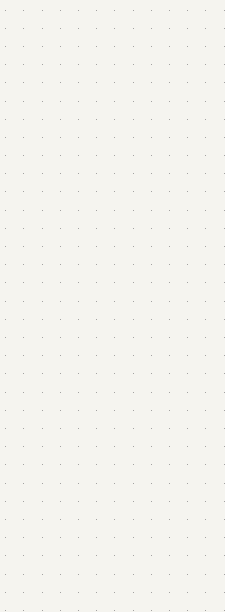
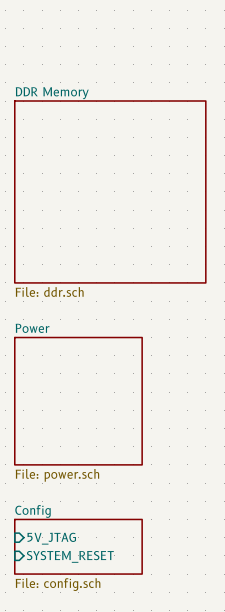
sheet DDR Memory: none -> File: ddr.sch (110, 191)
sheet Power: none -> File: power.sch (78, 401)
sheet pin: none -> 5V_JTAG (51, 538)
sheet Config: none -> File: config.sch (78, 546)
sheet pin: none -> SYSTEM_RESET (70, 556)

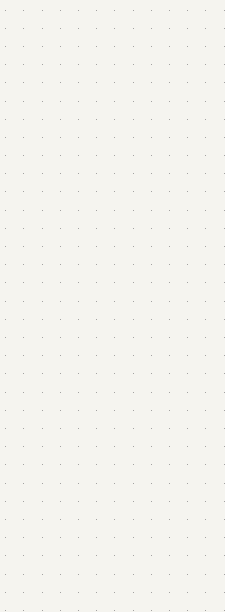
sheet DDR Memory: File: ddr.sch (110, 191) -> none
sheet Power: File: power.sch (78, 401) -> none
sheet pin: 5V_JTAG (51, 538) -> none
sheet Config: File: config.sch (78, 546) -> none
sheet pin: SYSTEM_RESET (70, 556) -> none

